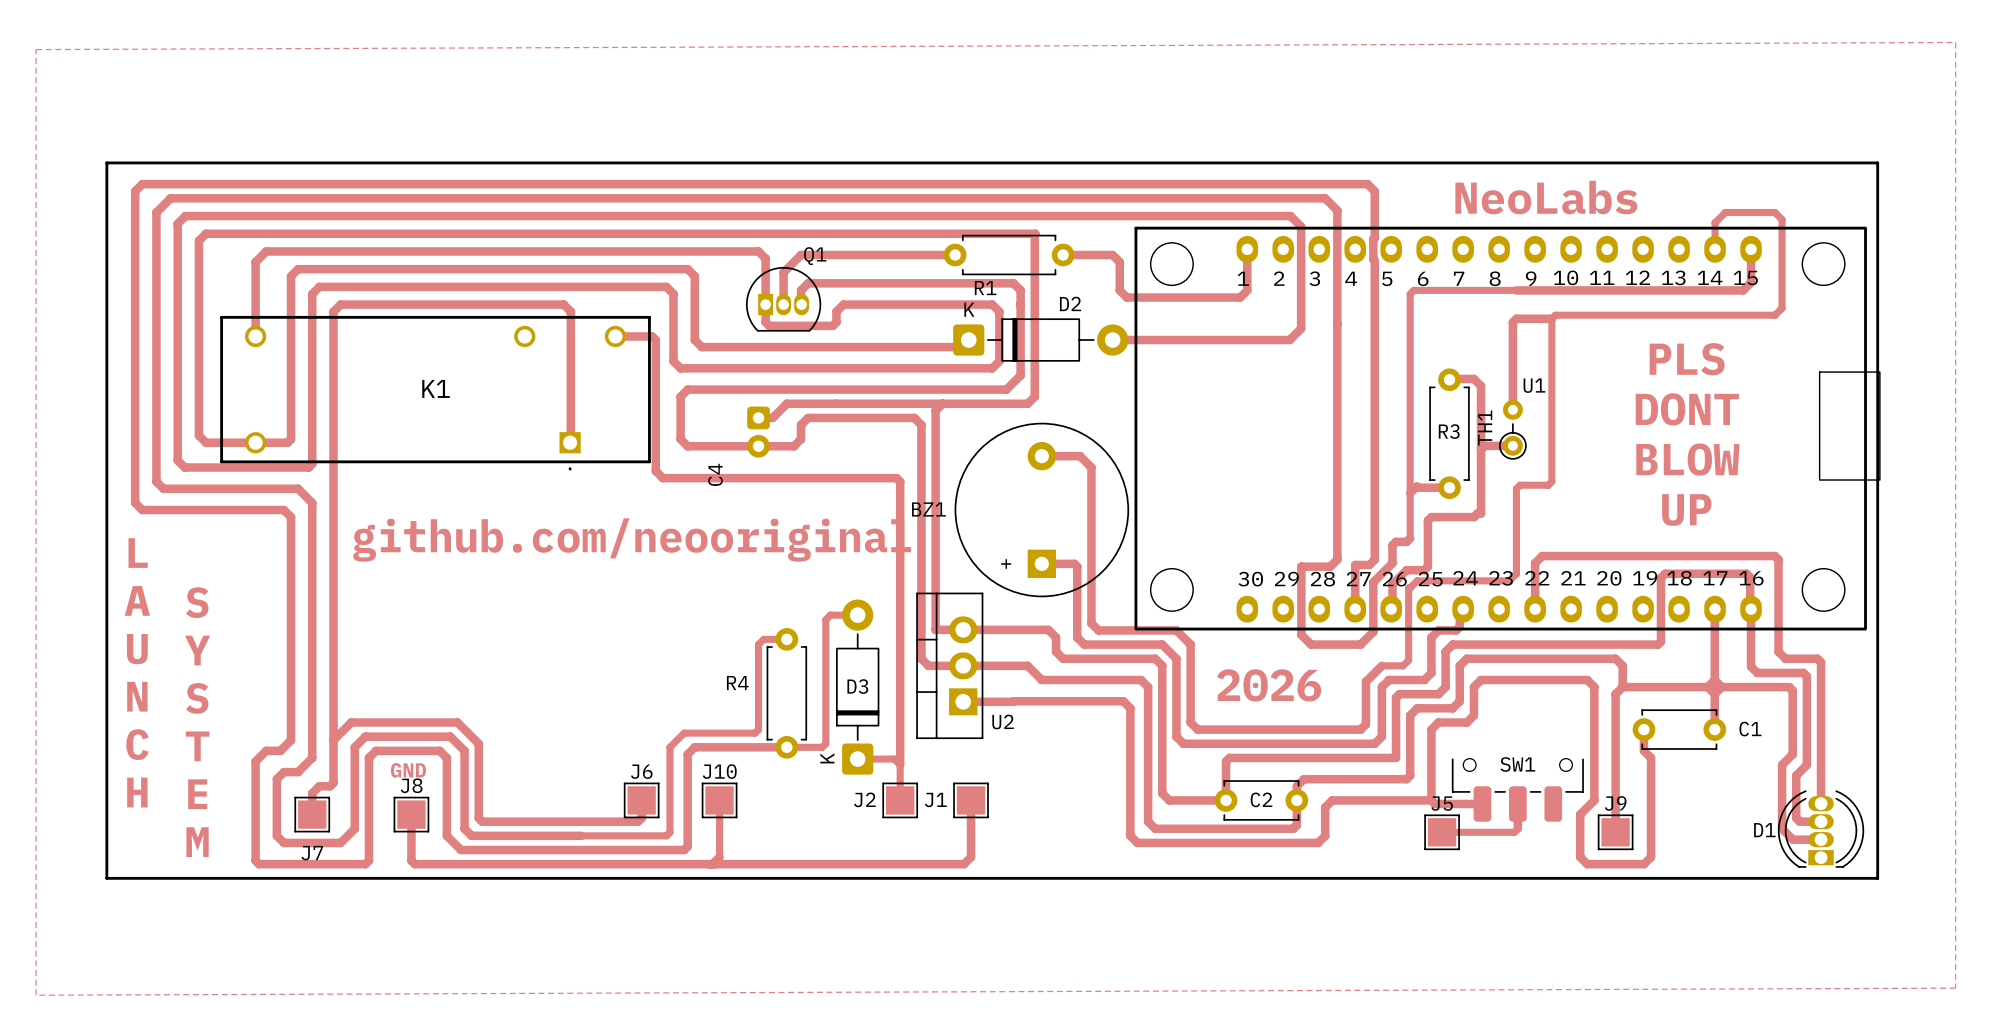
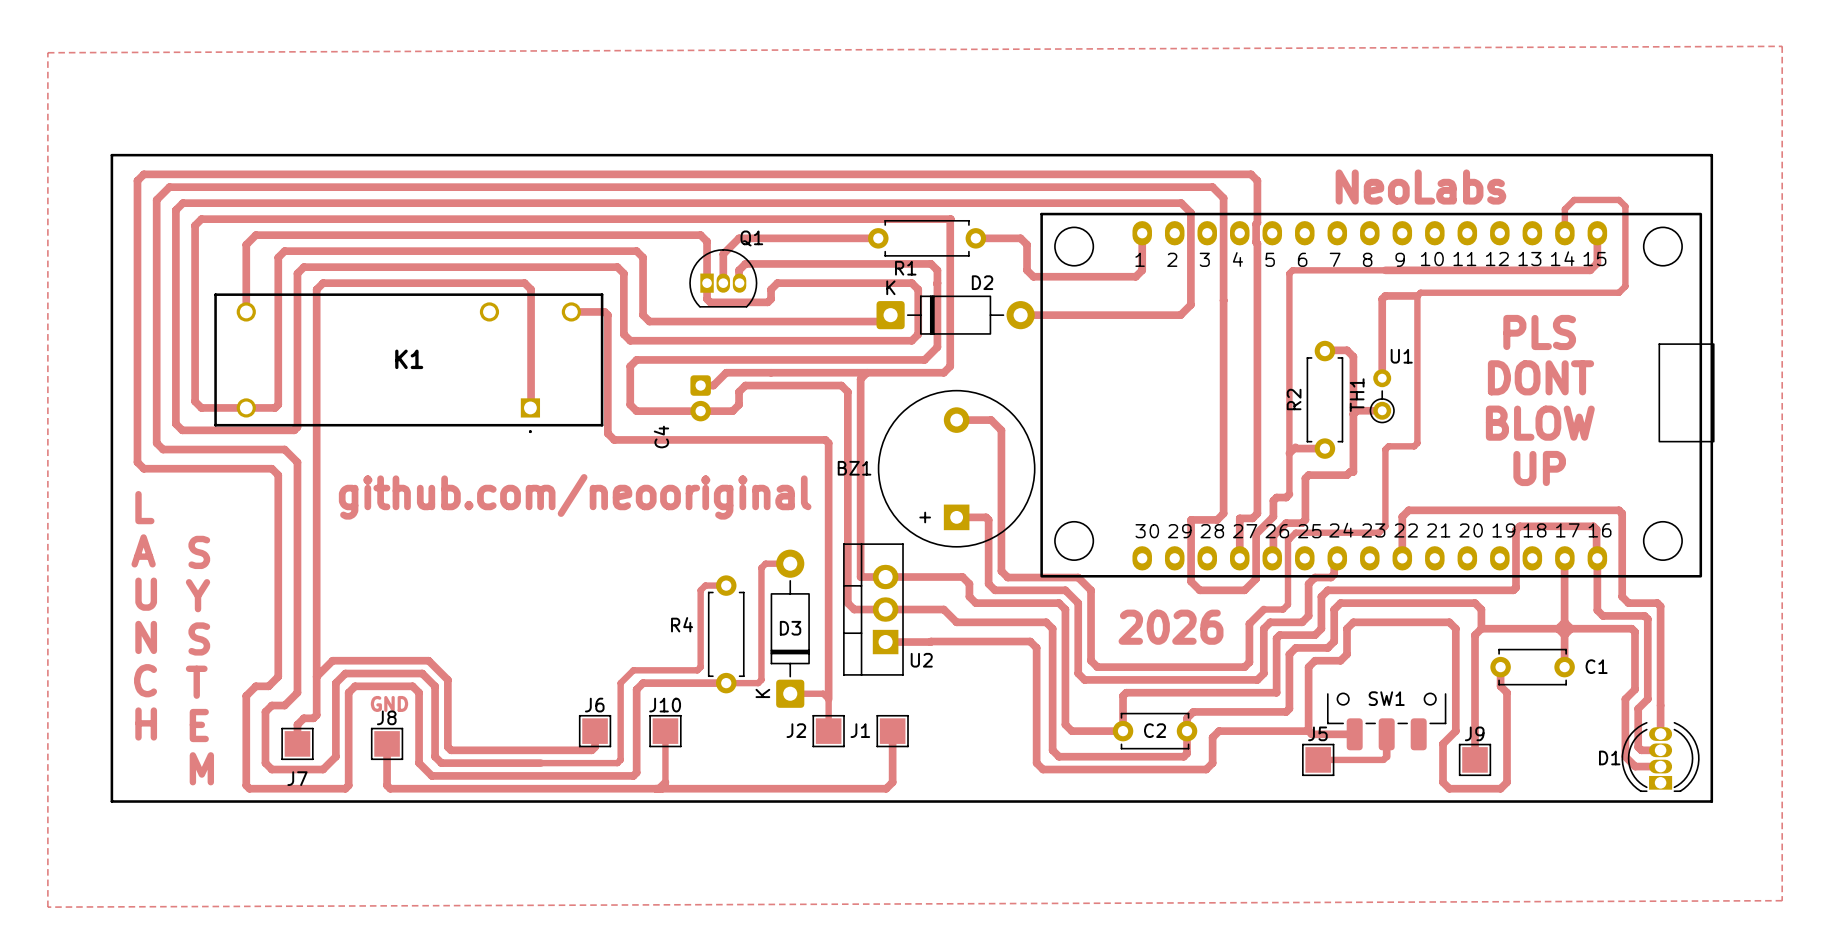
R3 name: R3 (1449, 431) -> R2 (1294, 399)

